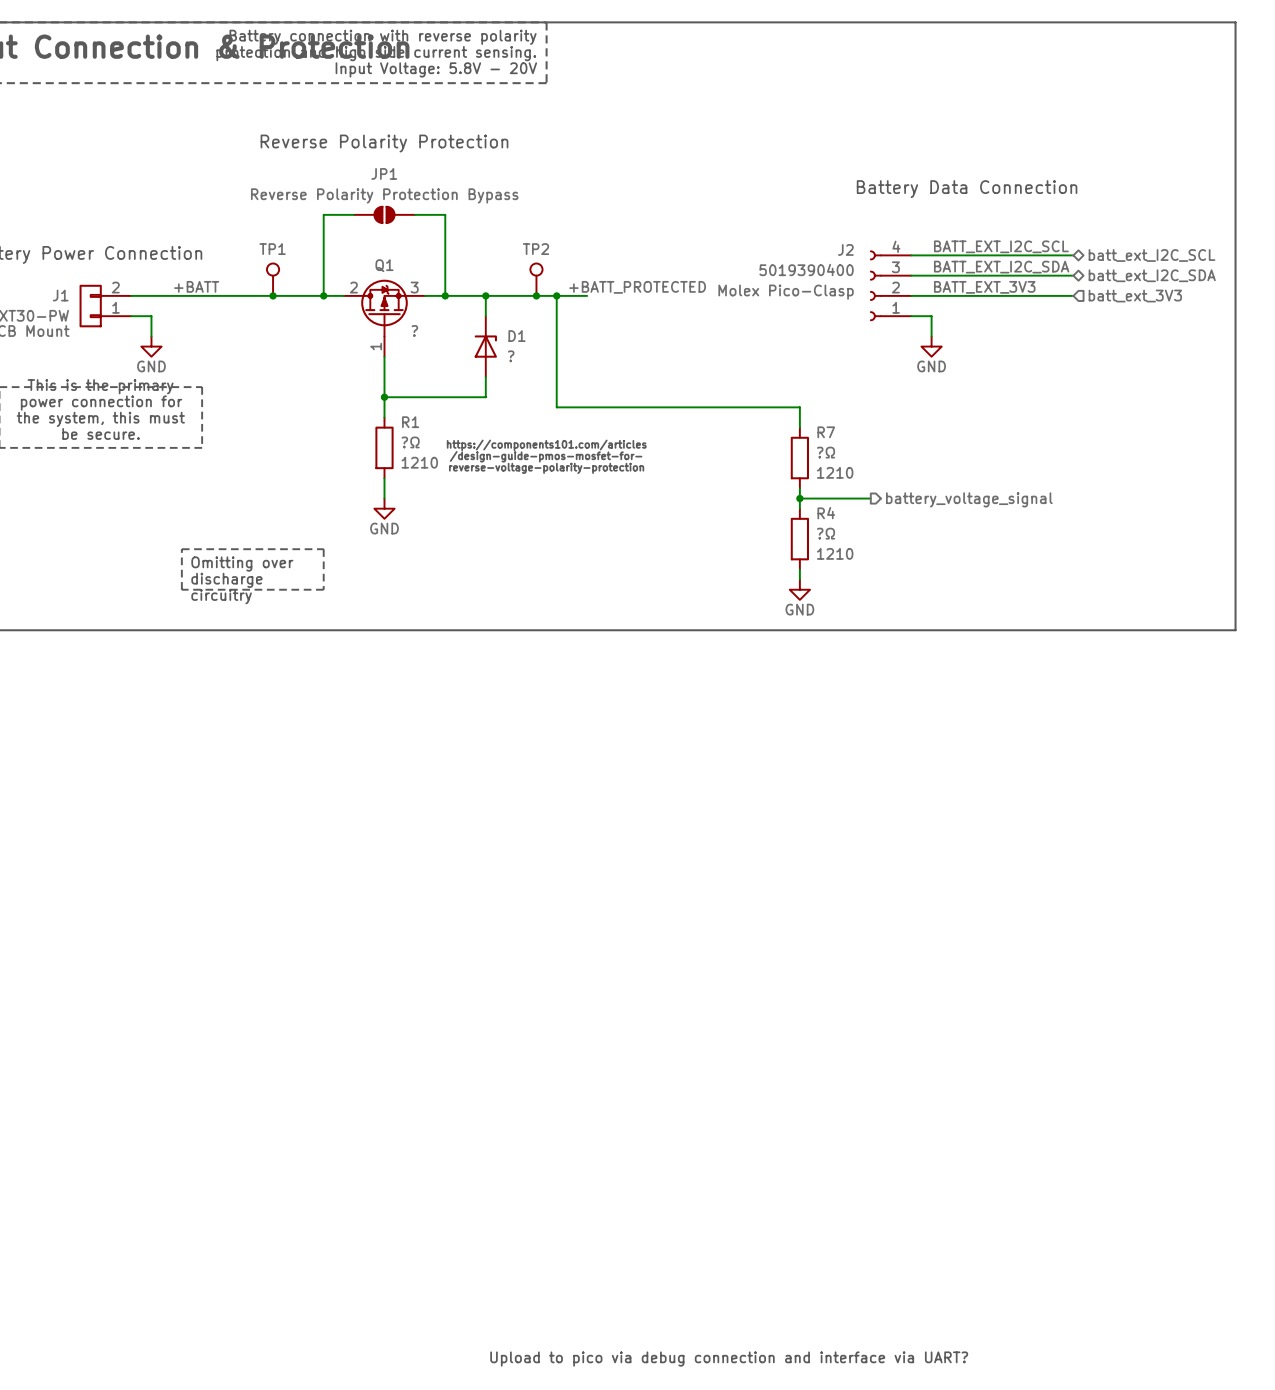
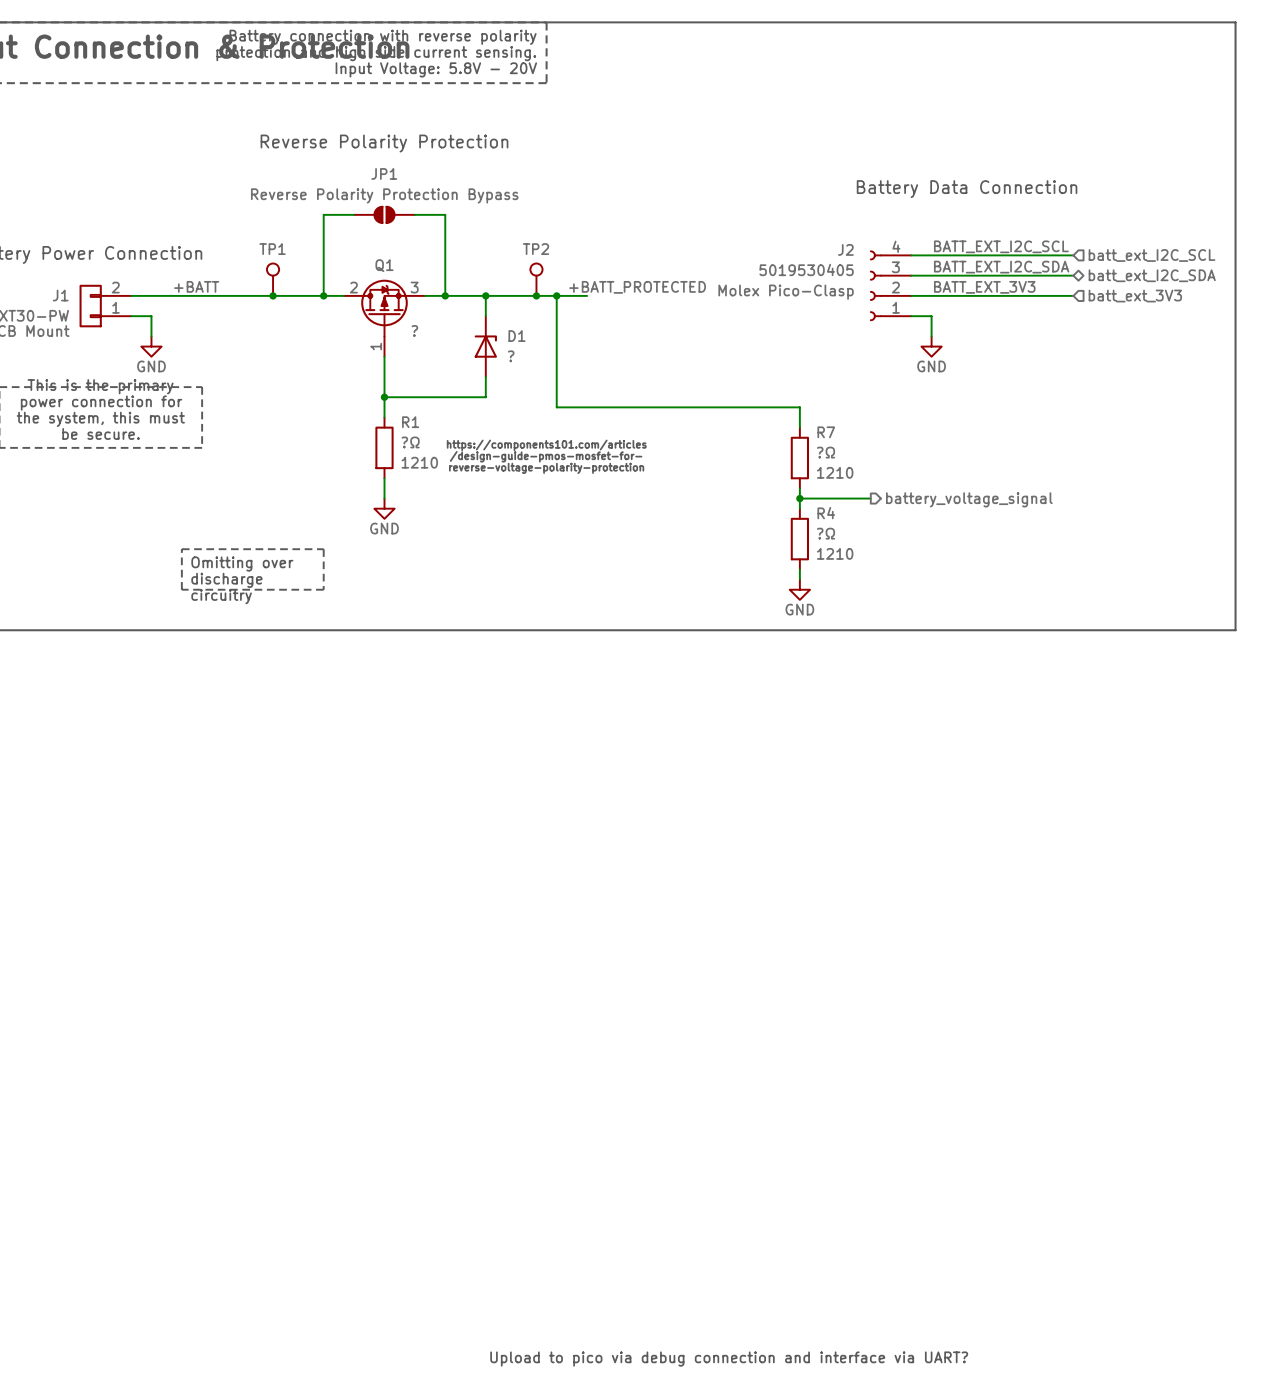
hierarchical label shape: bidirectional (1151, 255) -> input (1151, 255)
J2 value: 5019390400 (806, 269) -> 5019530405 (806, 269)

